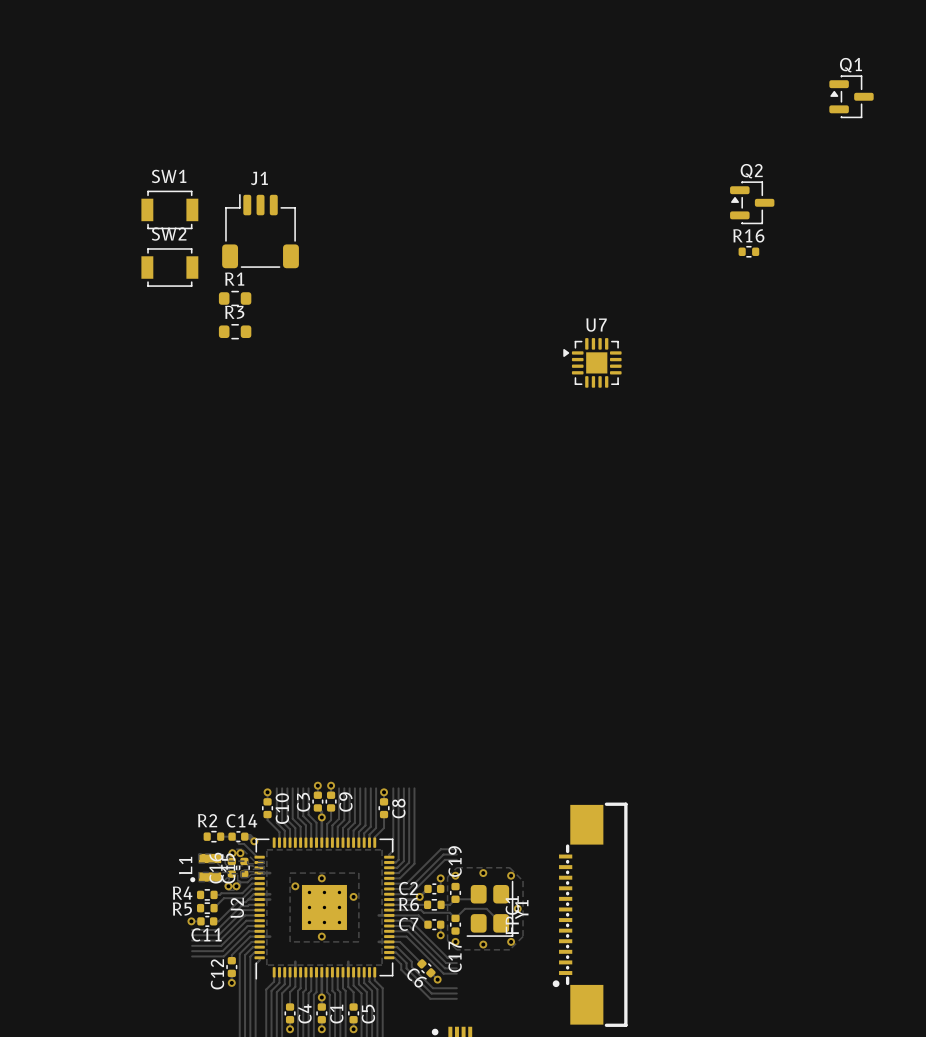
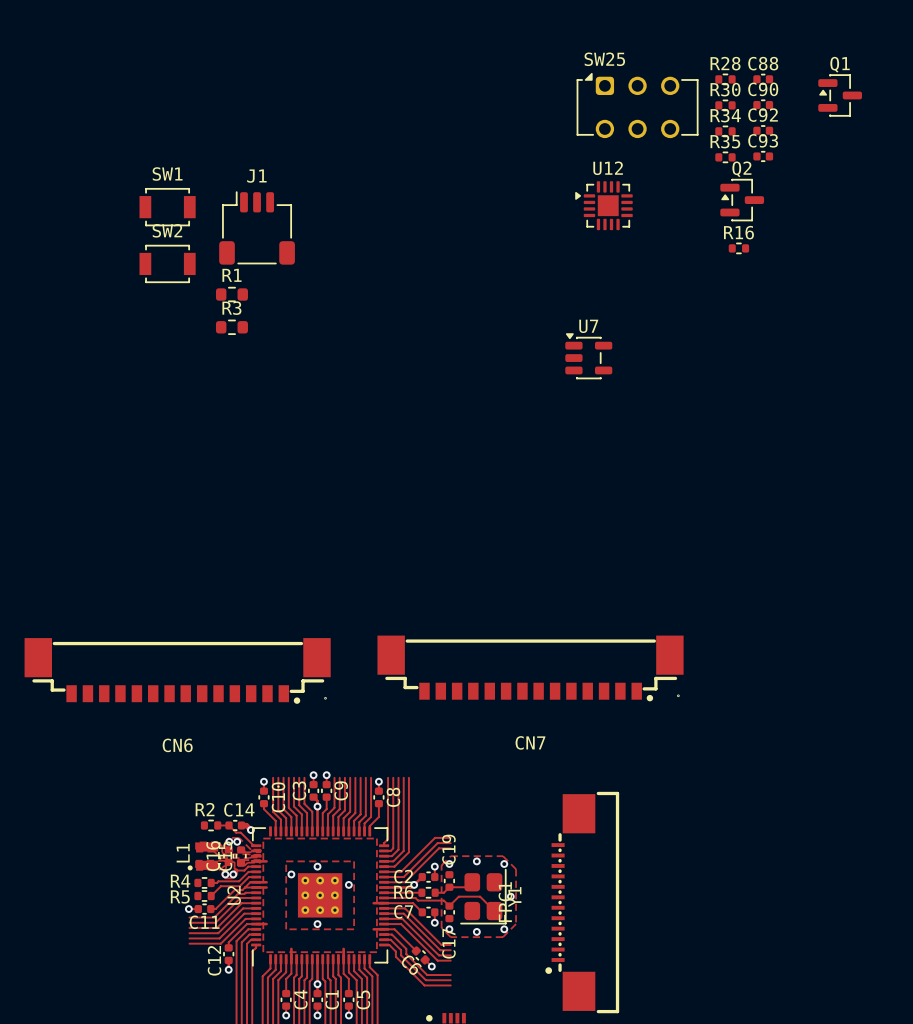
R28: none -> (725, 79)
C88: none -> (763, 79)
SW25: none -> (637, 105)
R30: none -> (725, 105)
C90: none -> (763, 105)
C92: none -> (763, 130)
R34: none -> (725, 131)
C93: none -> (763, 156)
R35: none -> (725, 157)
U12: none -> (603, 205)
U7 footprint: [563, 338, 622, 388] -> [565, 333, 613, 380]
CN7: none -> (530, 668)
CN6: none -> (177, 670)

